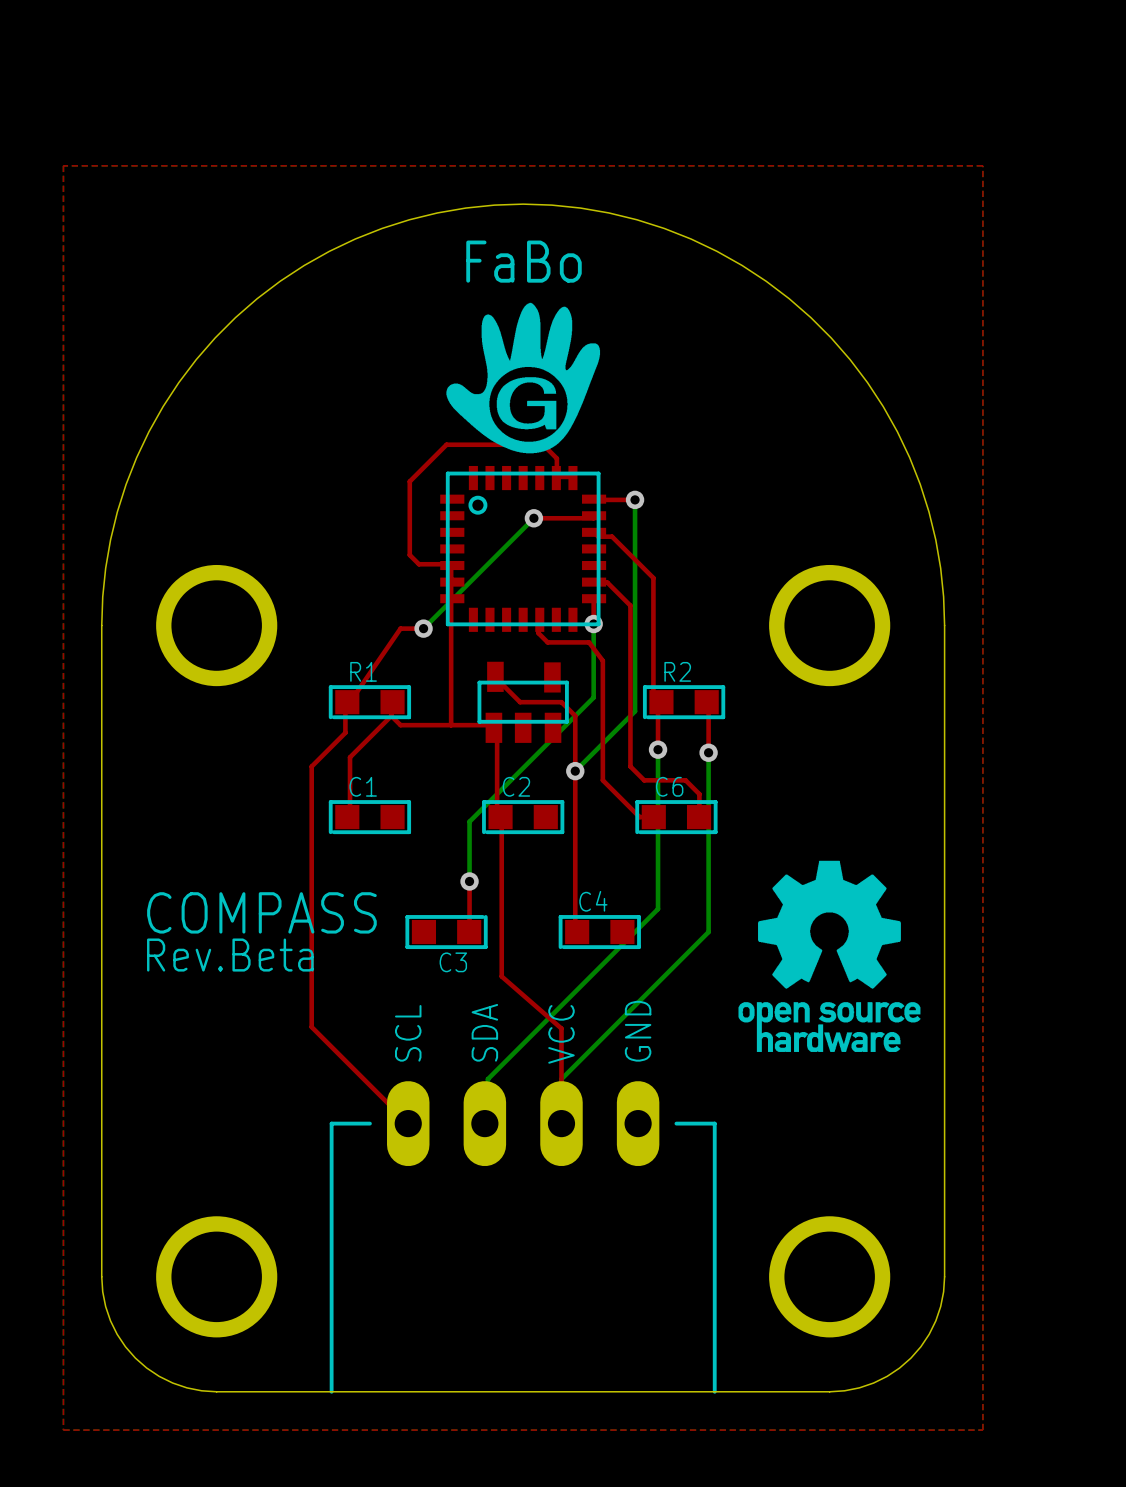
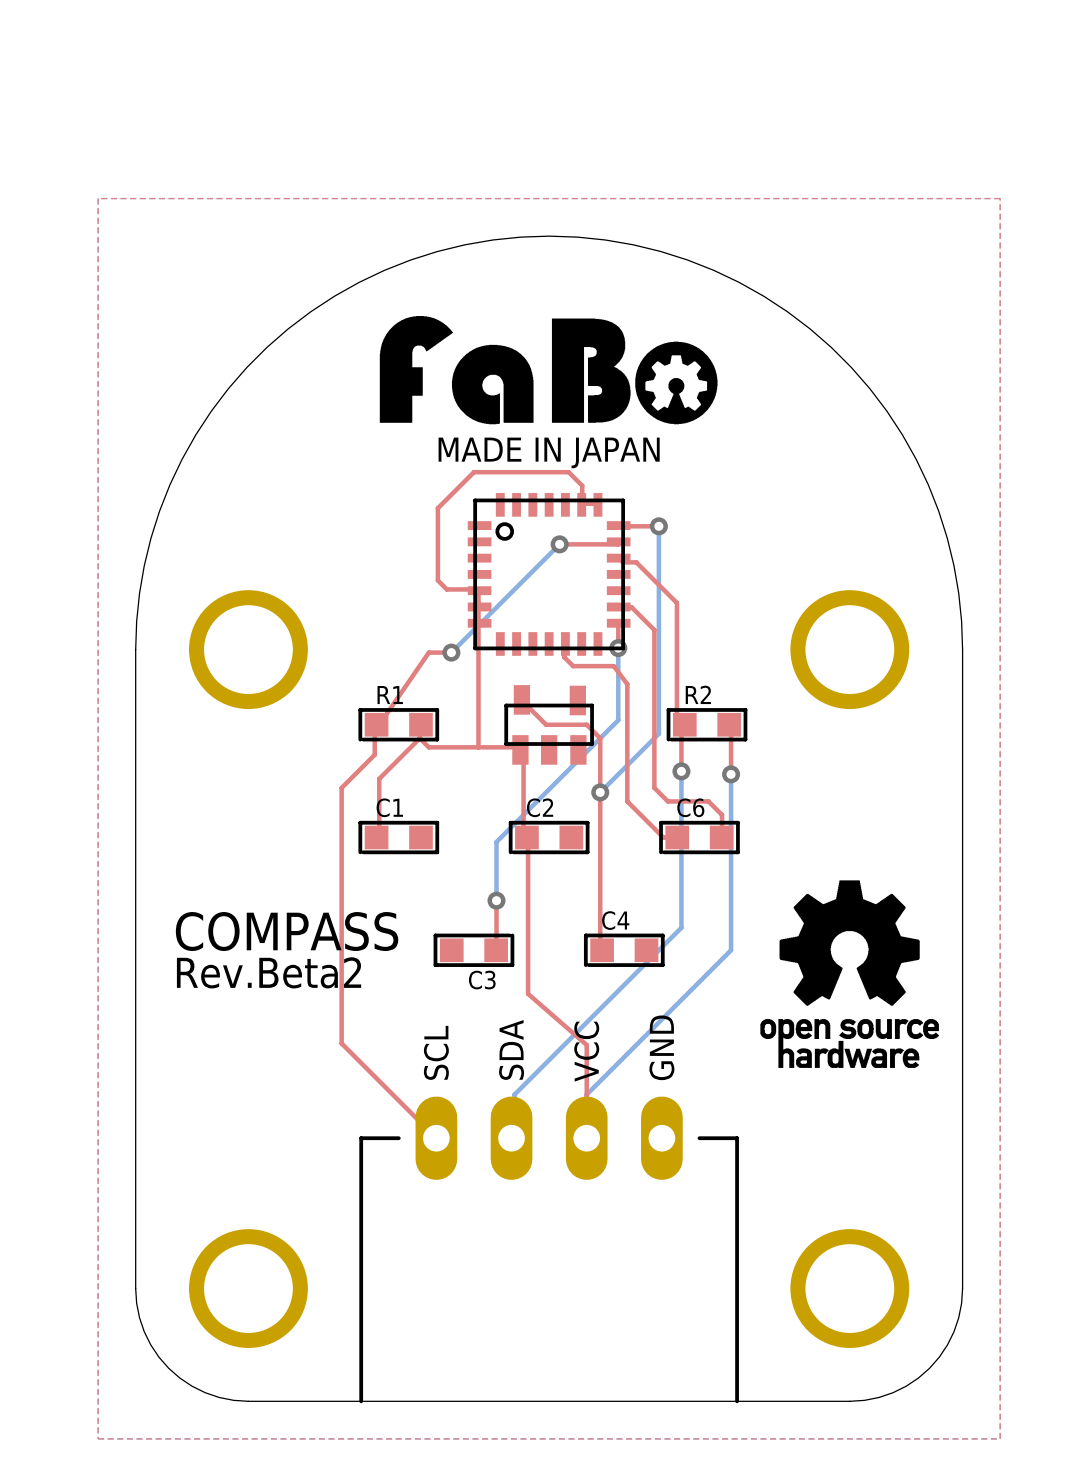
drawing: none -> [379, 316, 718, 425]
drawing: [446, 302, 601, 454] -> none
text: none -> MADE IN JAPAN (549, 452)
text: Rev.Beta (230, 955) -> Rev.Beta2 (269, 972)

